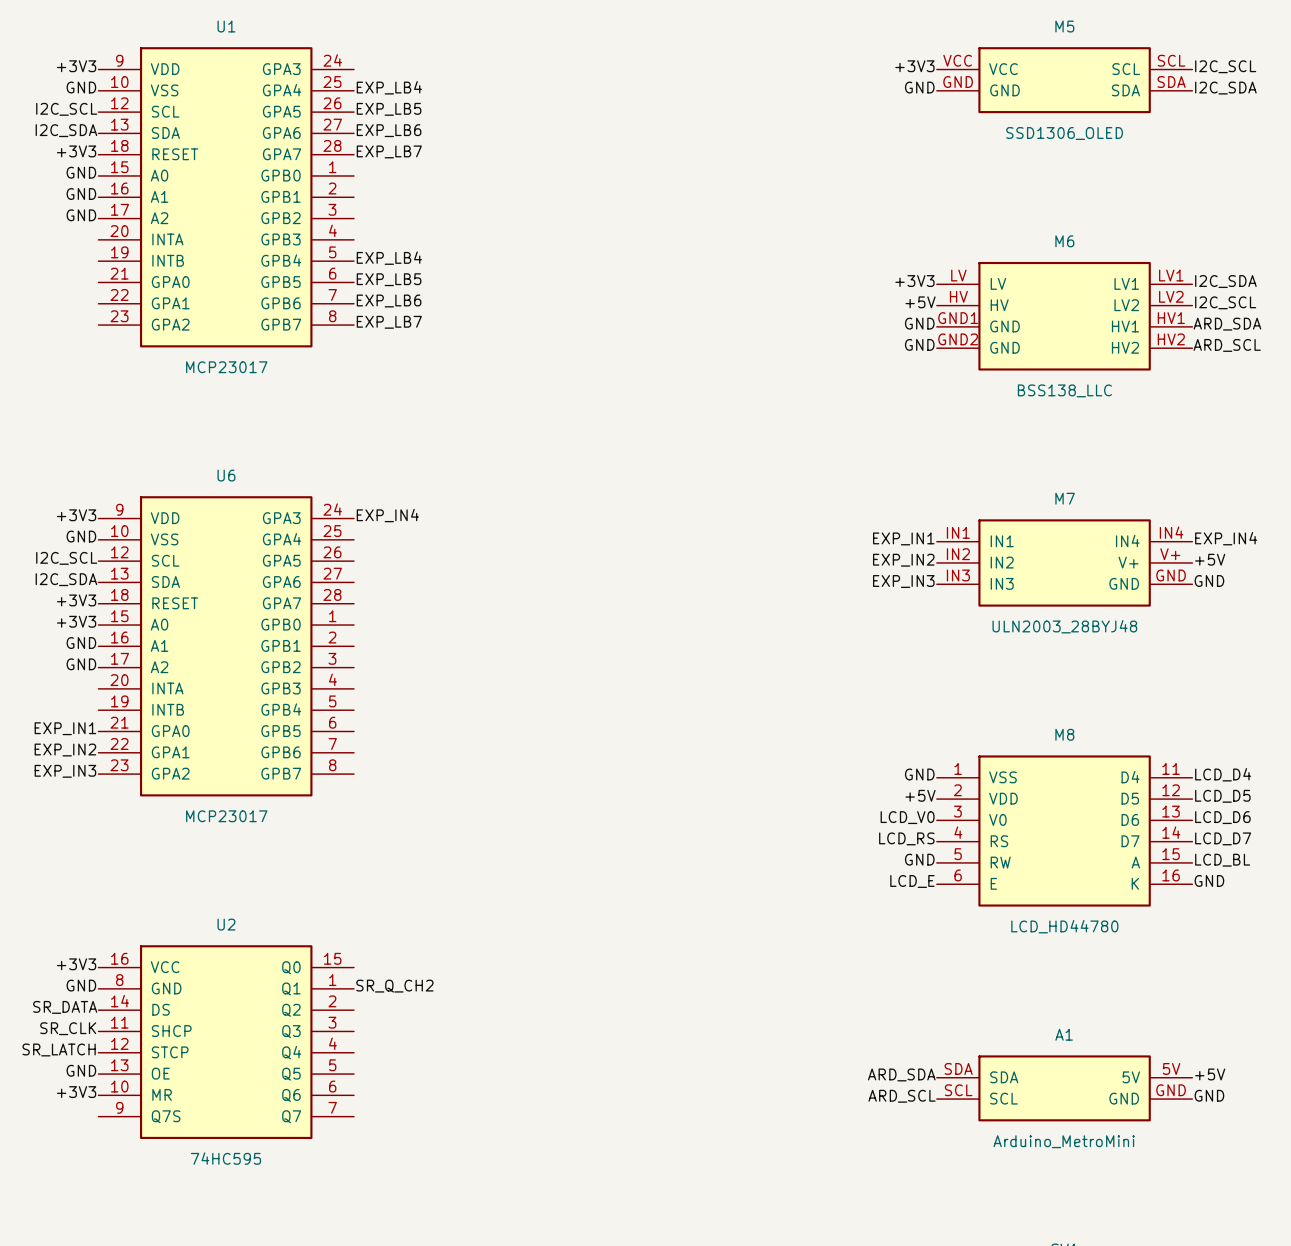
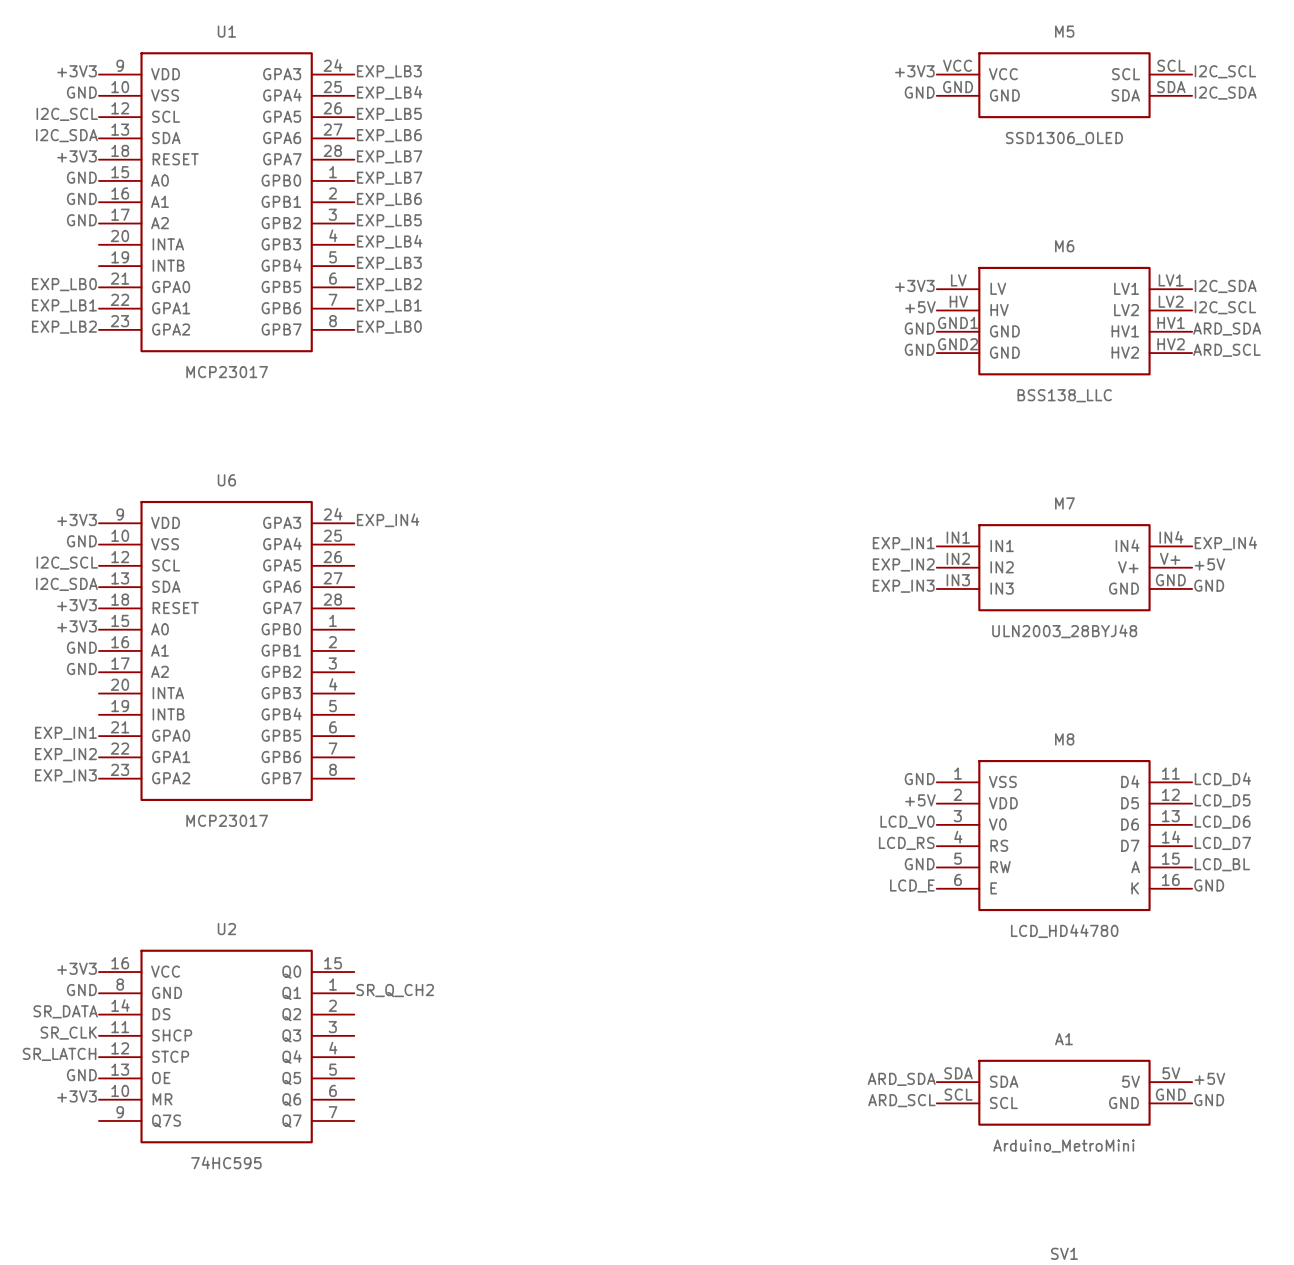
label: none -> EXP_LB3 (389, 71)
label: none -> EXP_LB7 (389, 178)
label: none -> EXP_LB6 (389, 199)
label: none -> EXP_LB5 (389, 220)
label: none -> EXP_LB4 (389, 241)
label: EXP_LB4 (389, 258) -> EXP_LB3 (389, 263)
label: none -> EXP_LB0 (64, 284)
label: EXP_LB5 (389, 279) -> EXP_LB2 (389, 284)
label: none -> EXP_LB1 (64, 305)
label: EXP_LB6 (389, 300) -> EXP_LB1 (389, 305)
label: none -> EXP_LB2 (64, 327)
label: EXP_LB7 (389, 322) -> EXP_LB0 (389, 327)

